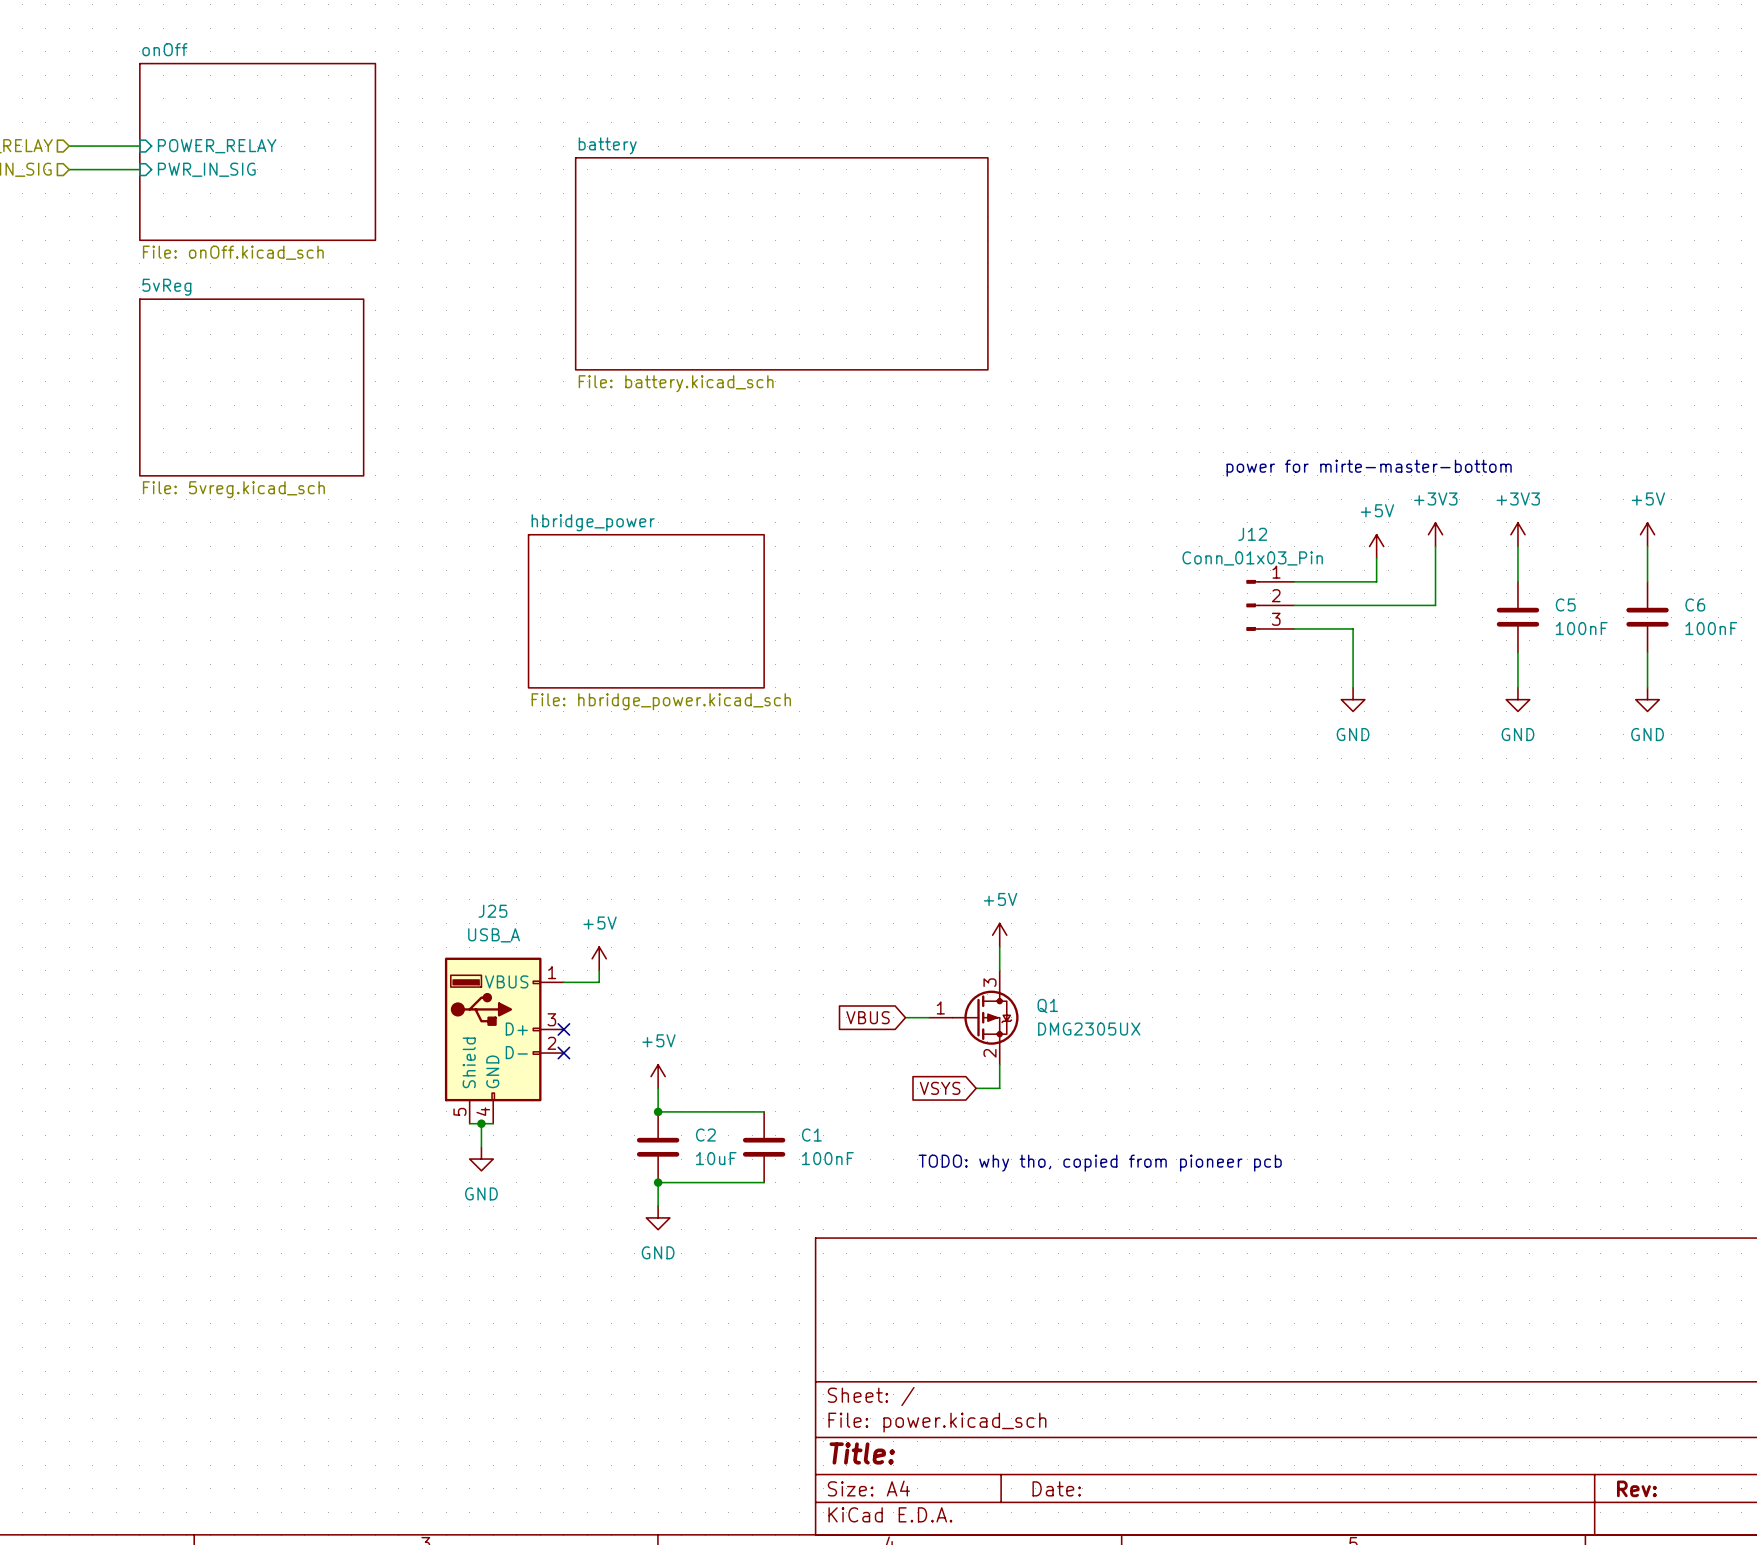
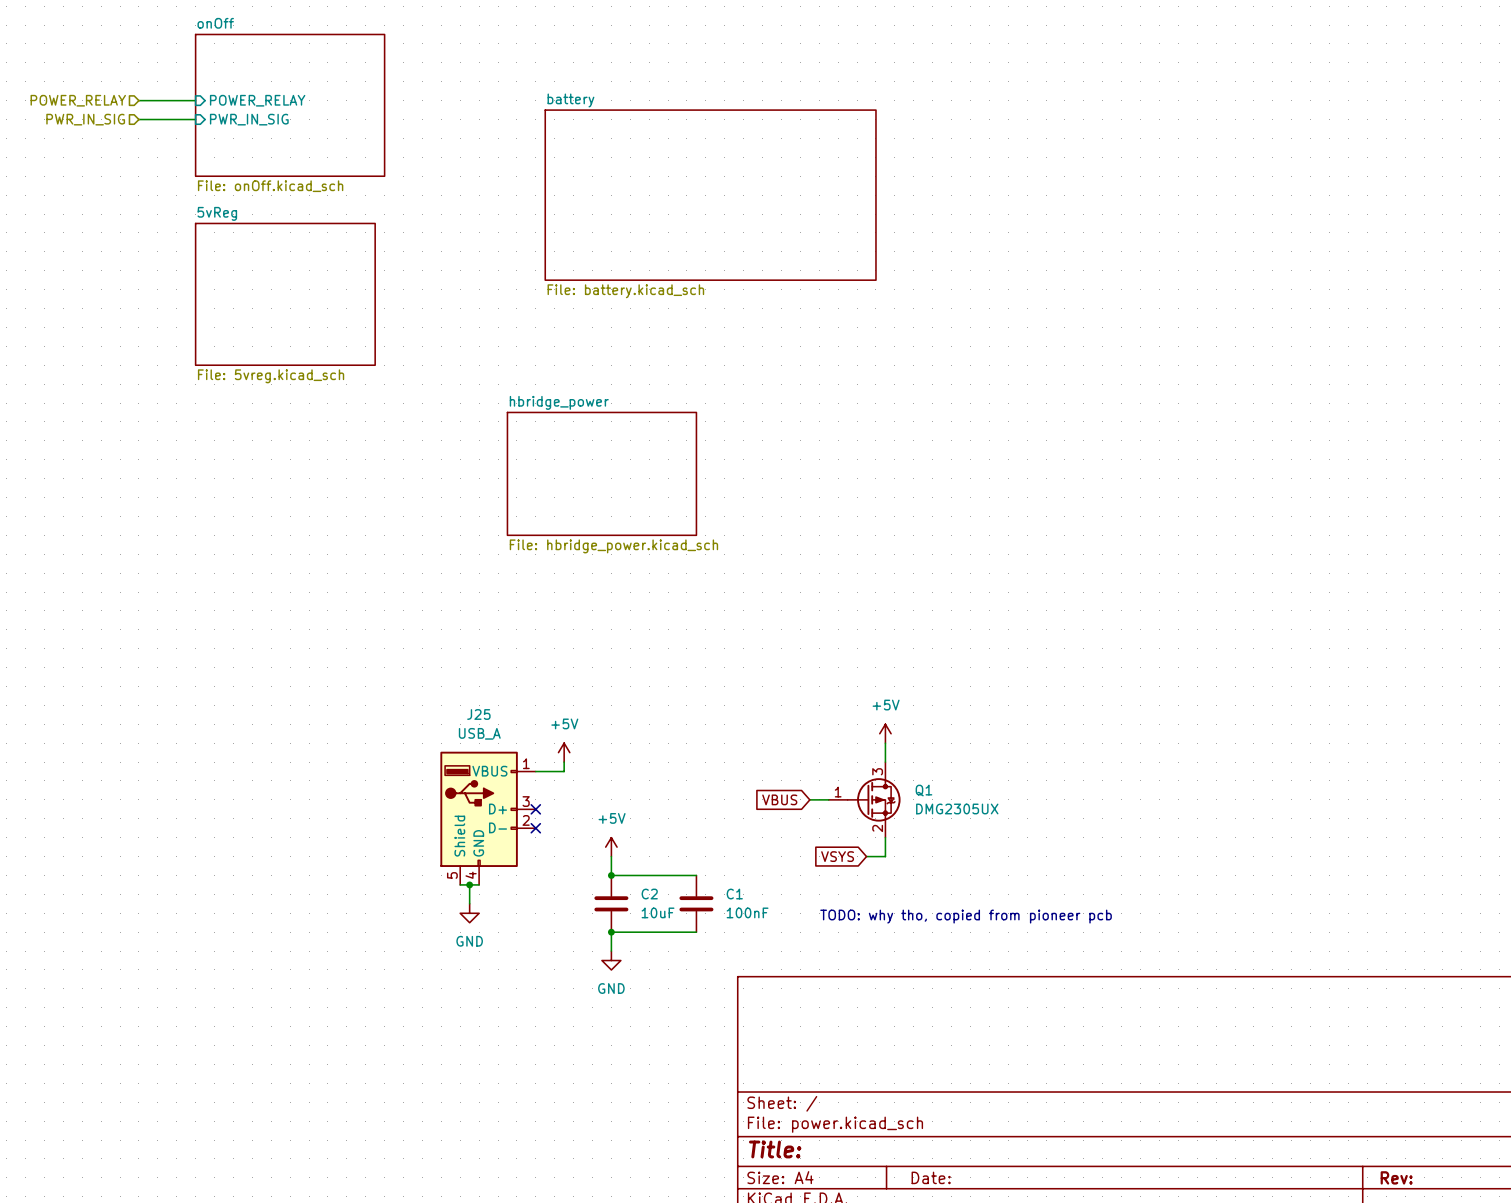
text: power for mirte-master-bottom (1369, 468) -> none
power symbol: +3V3 (1435, 534) -> none
power symbol: +3V3 (1517, 534) -> none
power symbol: +5V (1647, 534) -> none
power symbol: +5V (1376, 546) -> none
wire: (1435, 546) (1435, 605) (1294, 605) -> none
wire: (1517, 546) (1517, 581) -> none
wire: (1647, 546) (1647, 581) -> none
wire: (1376, 558) (1376, 581) (1294, 581) -> none
J12: Conn_01x03_Pin (1270, 605) -> none
C5: 100nF (1517, 617) -> none
C6: 100nF (1647, 617) -> none
wire: (1294, 628) (1353, 628) (1353, 687) -> none
wire: (1517, 652) (1517, 687) -> none
wire: (1647, 652) (1647, 687) -> none
power symbol: GND (1353, 699) -> none
power symbol: GND (1517, 699) -> none
power symbol: GND (1647, 699) -> none

